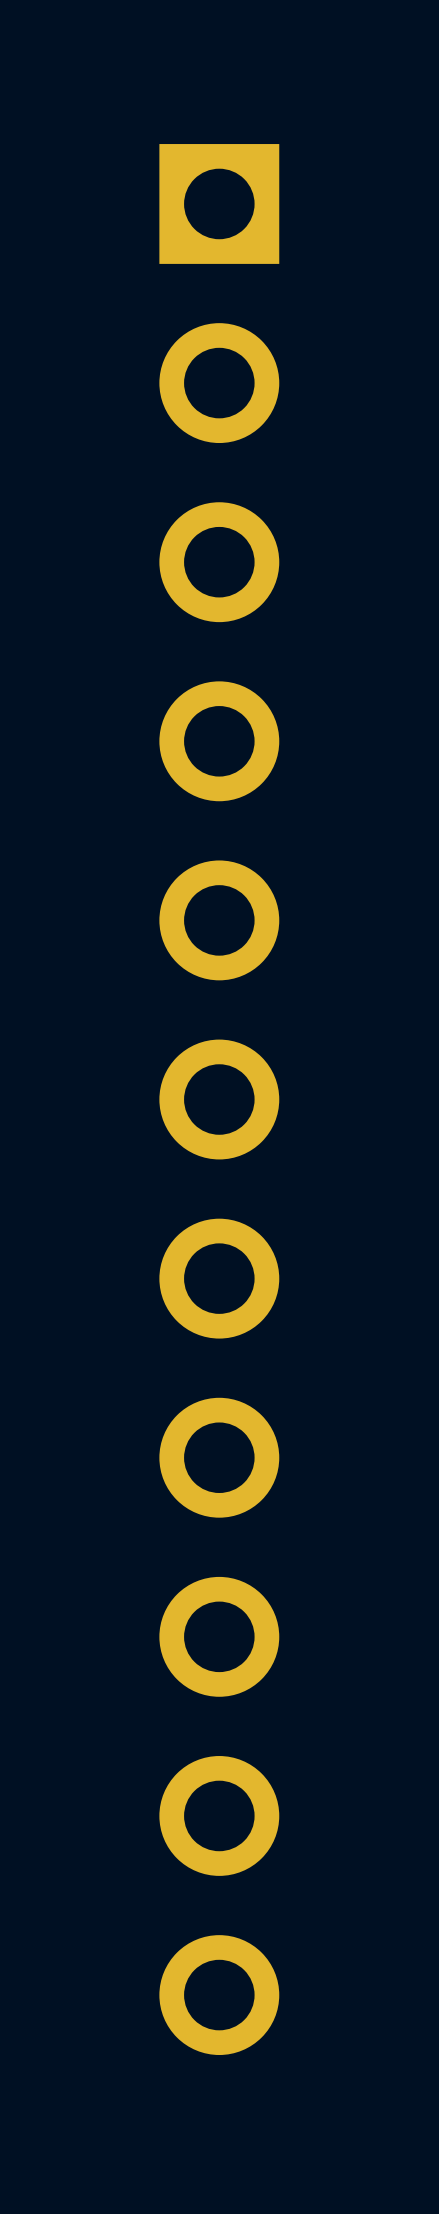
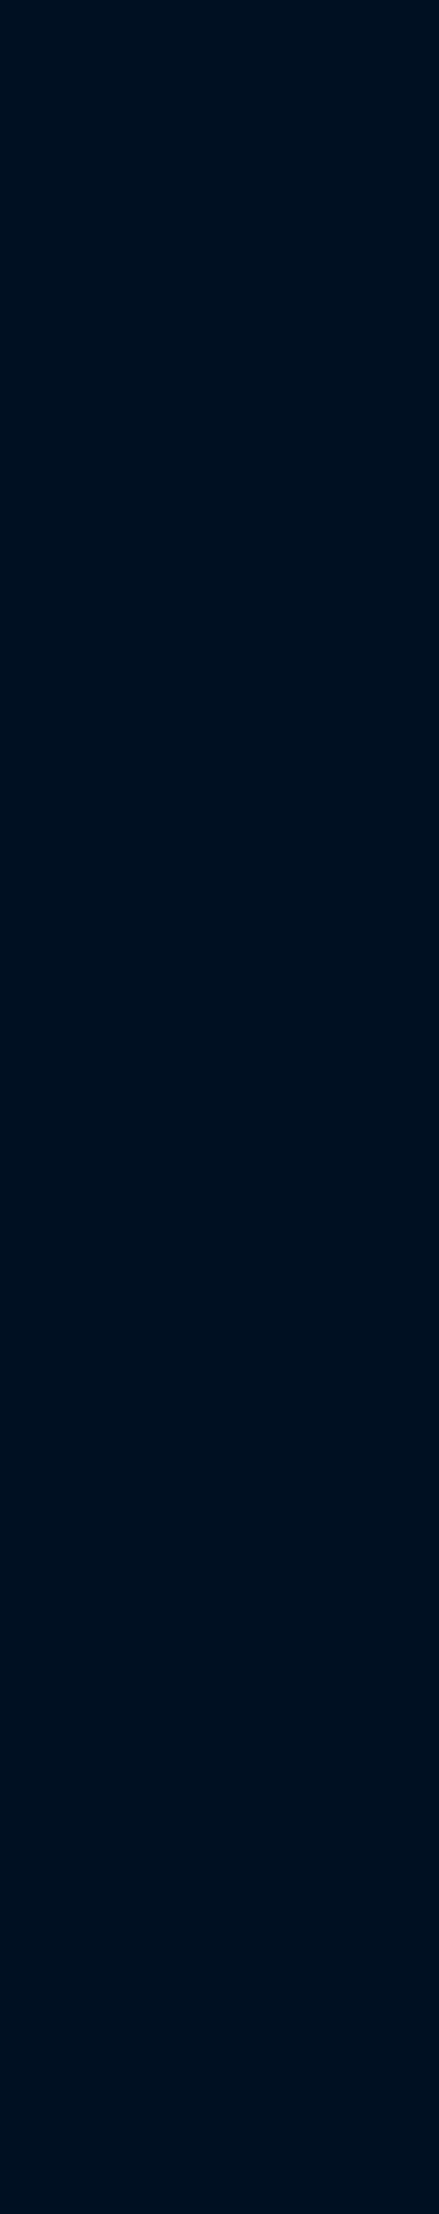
part: (219, 1099) -> none

